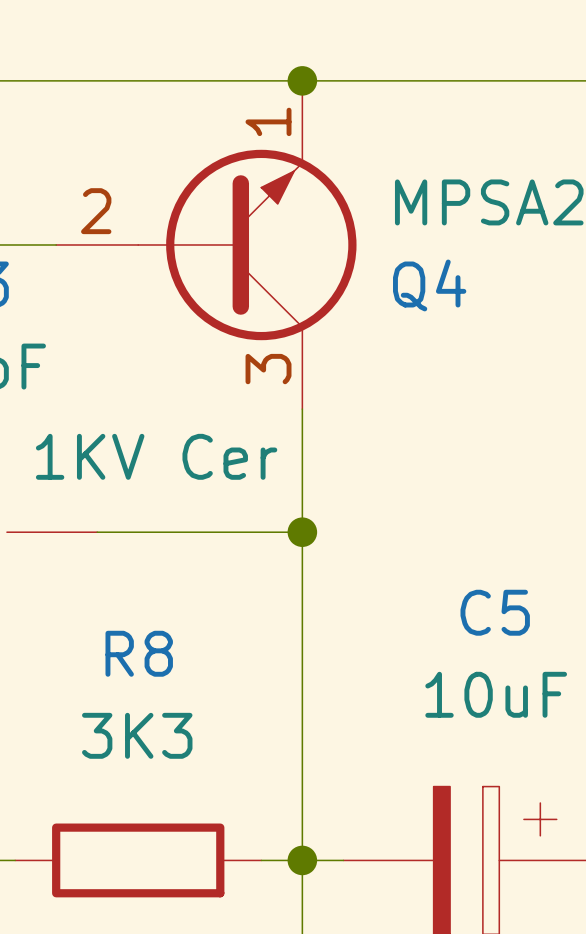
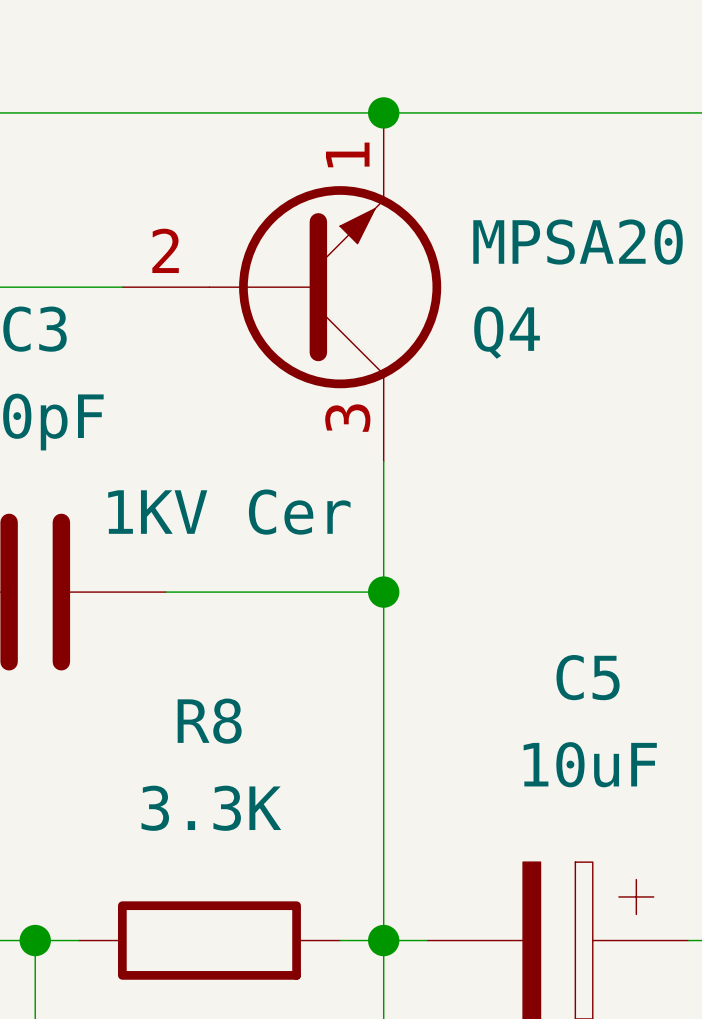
R8 value: 3K3 (137, 735) -> 3.3K (211, 808)

